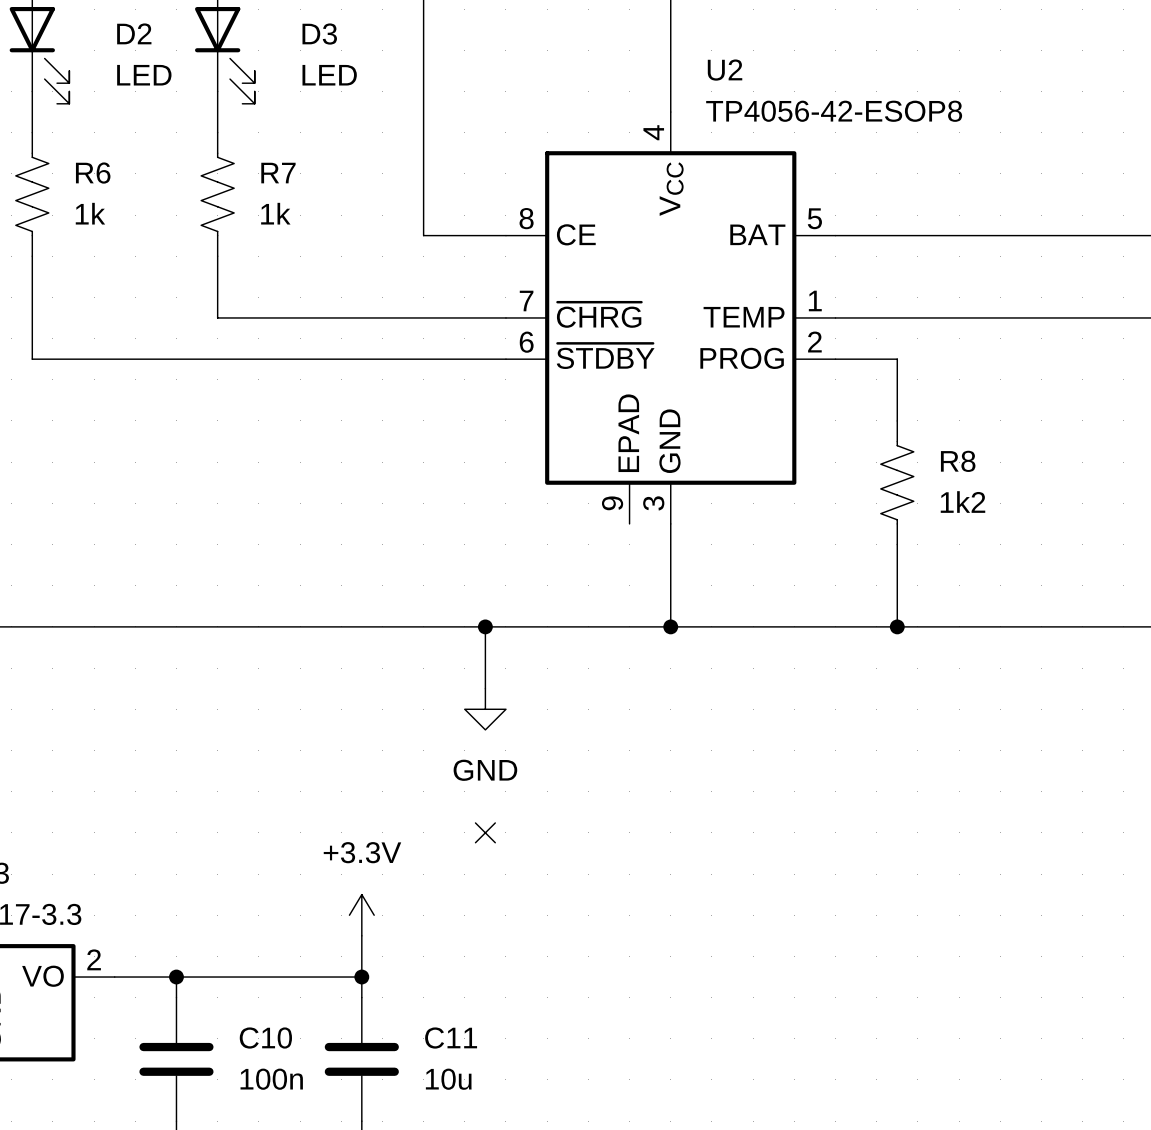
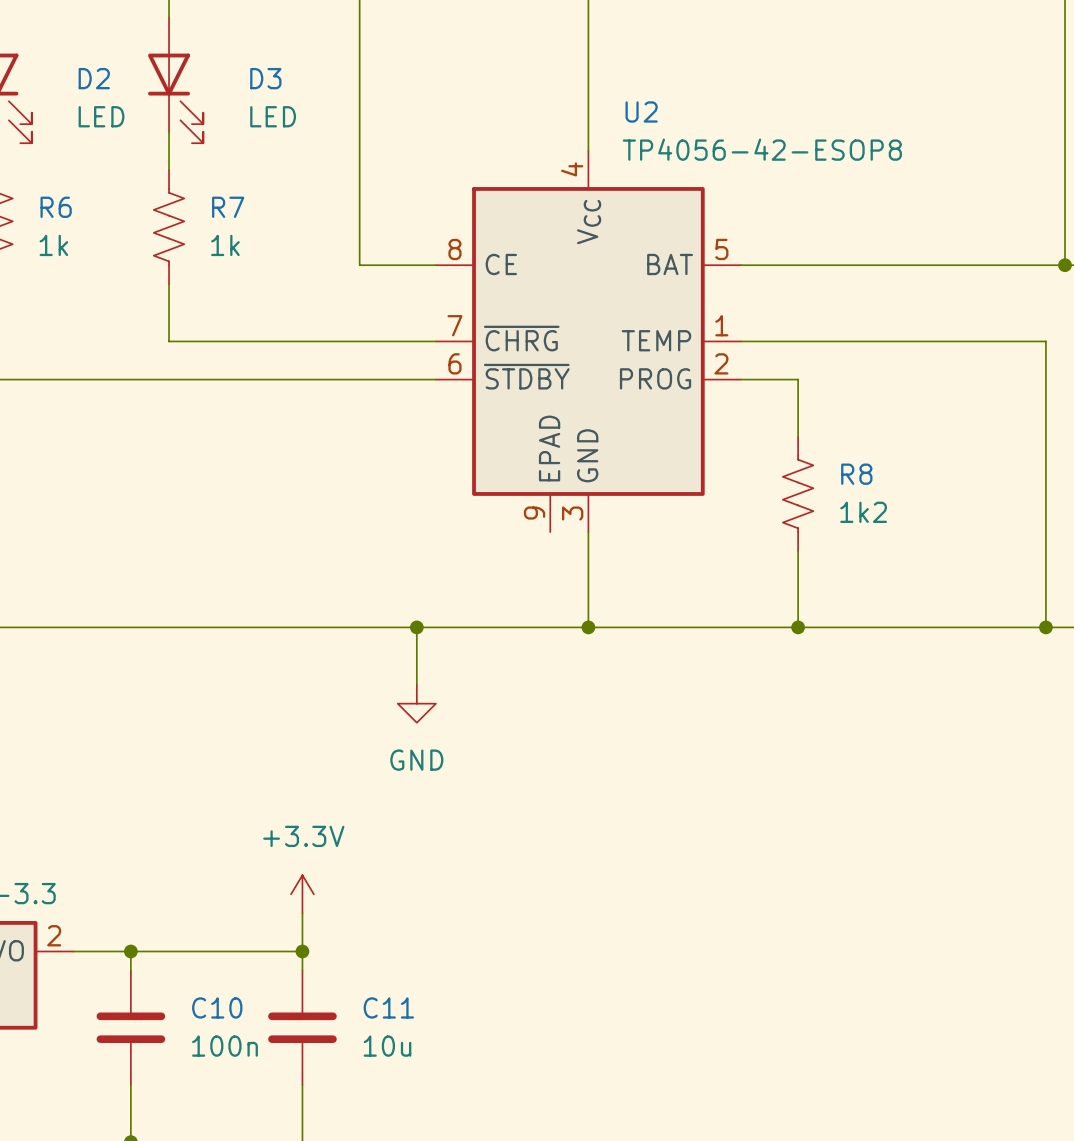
no-connect mark: (485, 832) -> none

